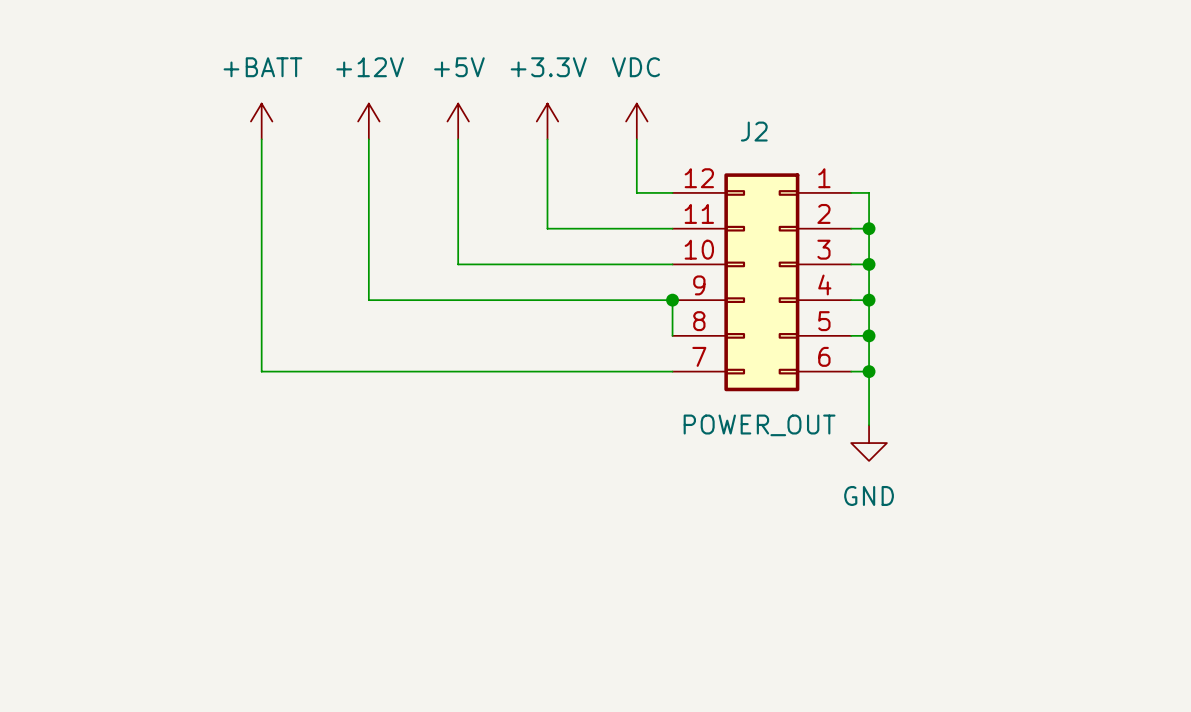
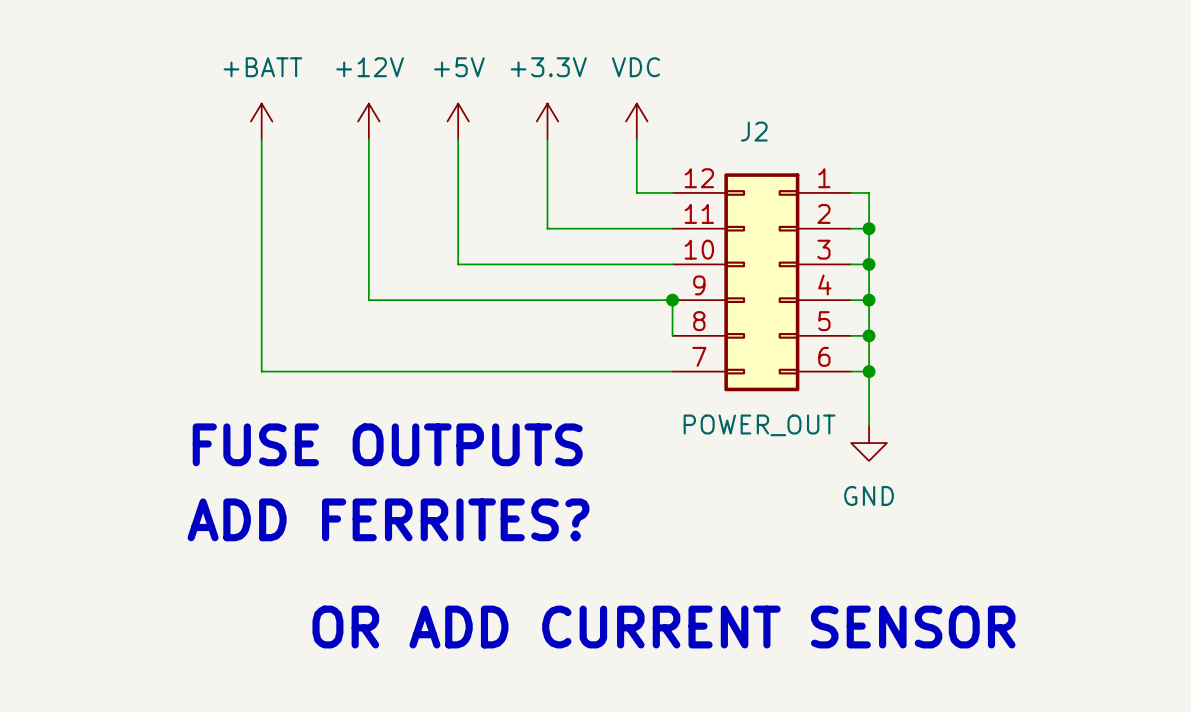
text: none -> FUSE OUTPUTS (387, 444)
text: none -> ADD FERRITES? (388, 519)
text: none -> OR ADD CURRENT SENSOR (663, 627)

